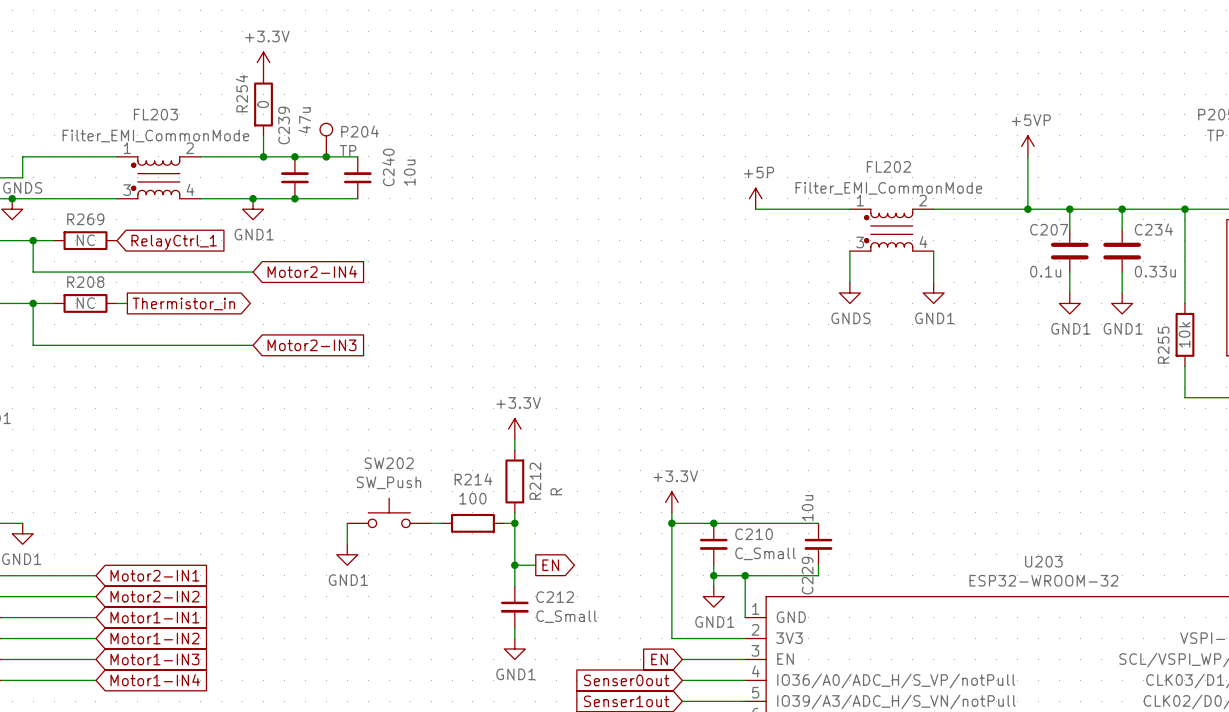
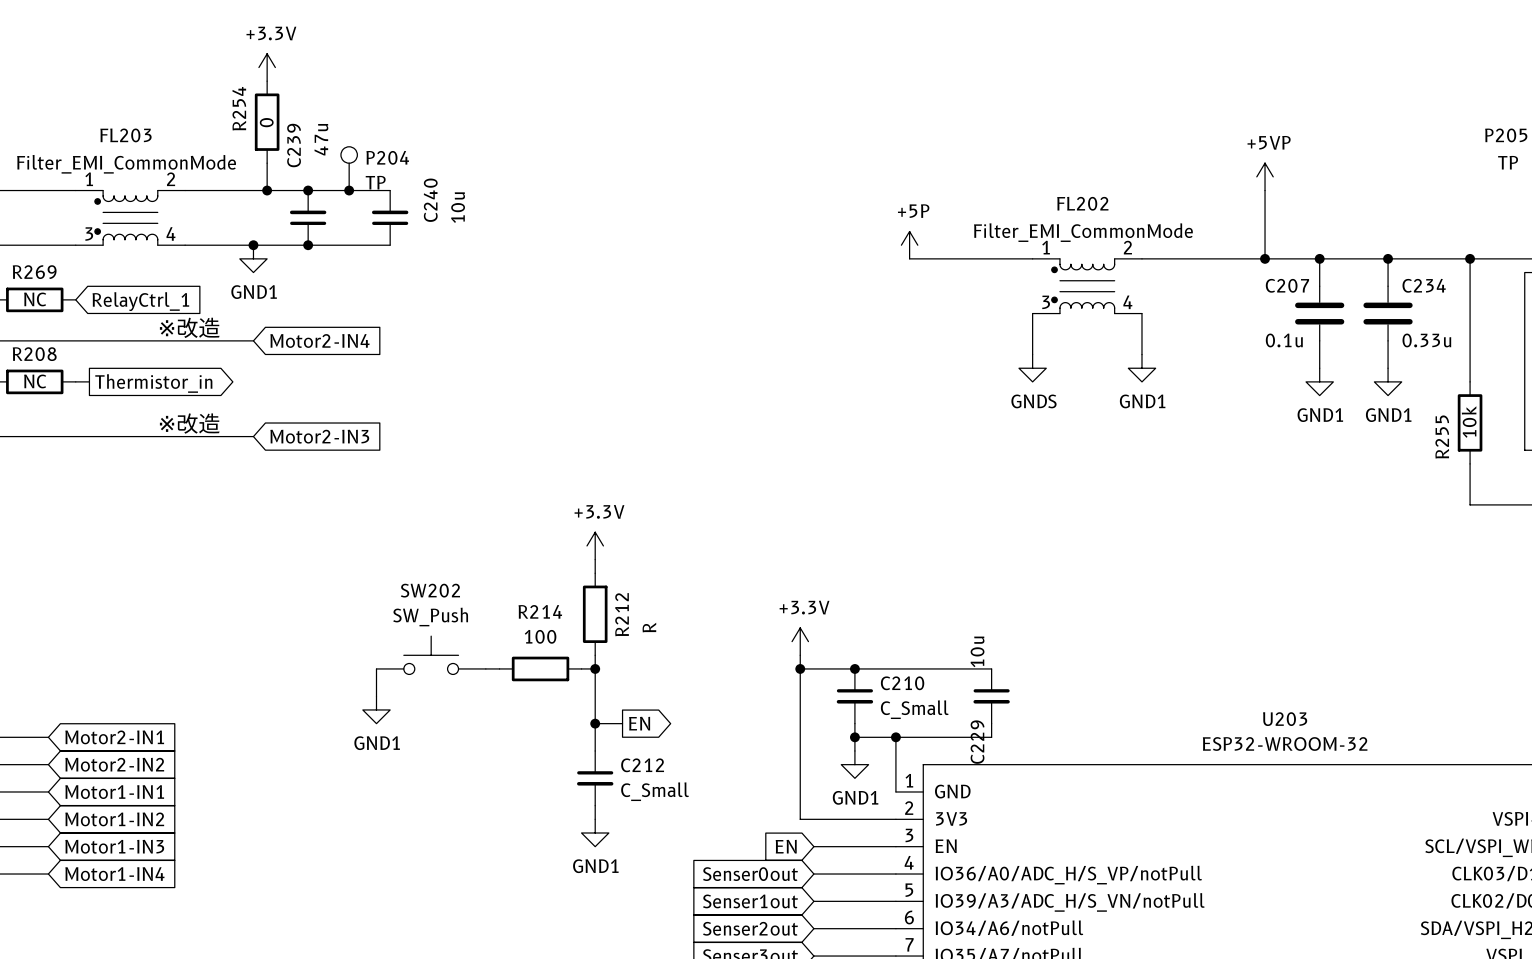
text: none -> ※改造 (189, 327)
text: none -> ※改造 (189, 423)

